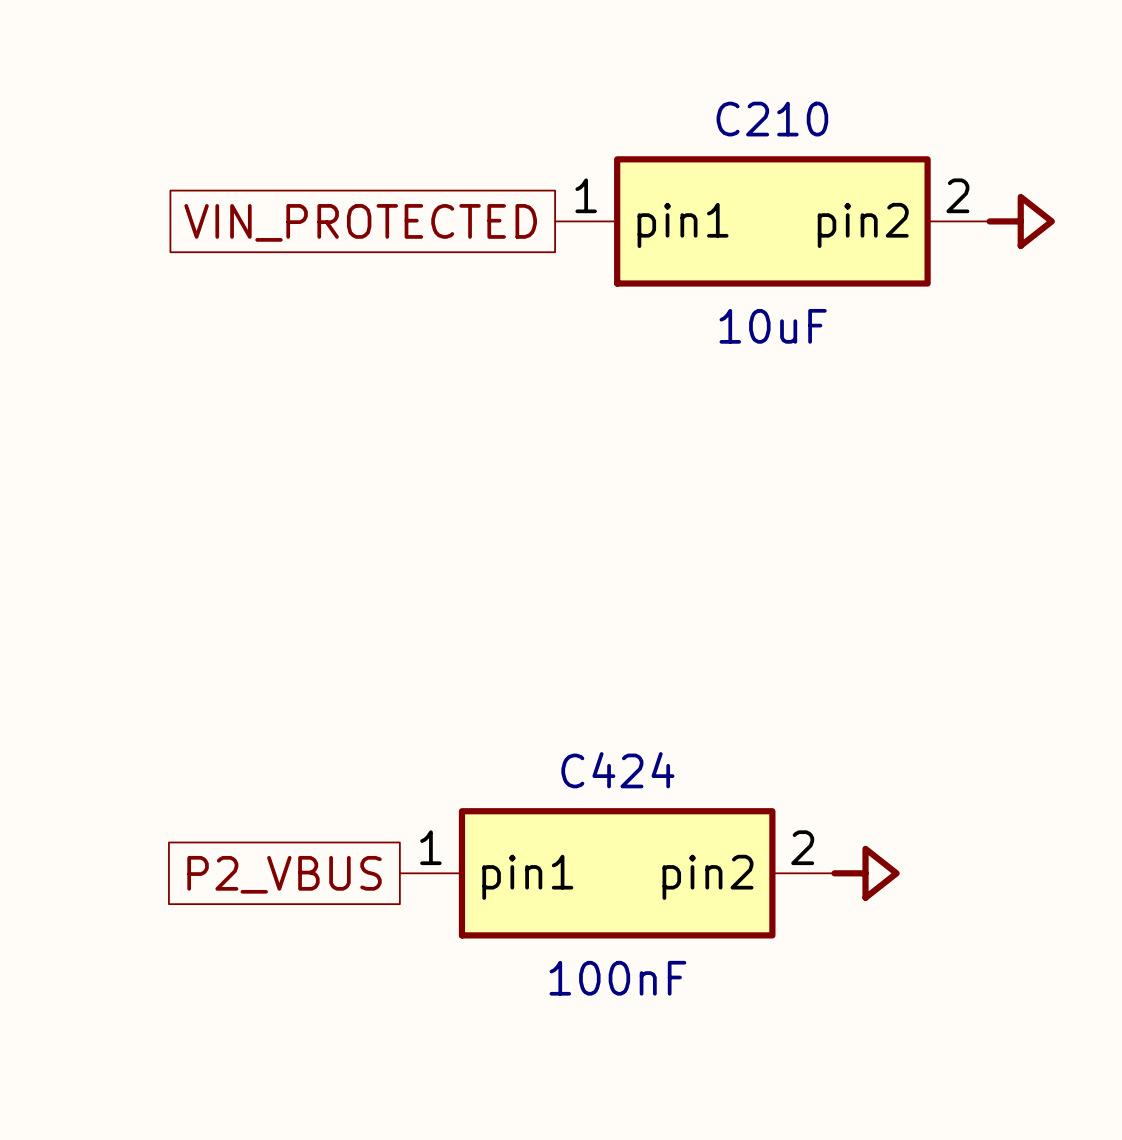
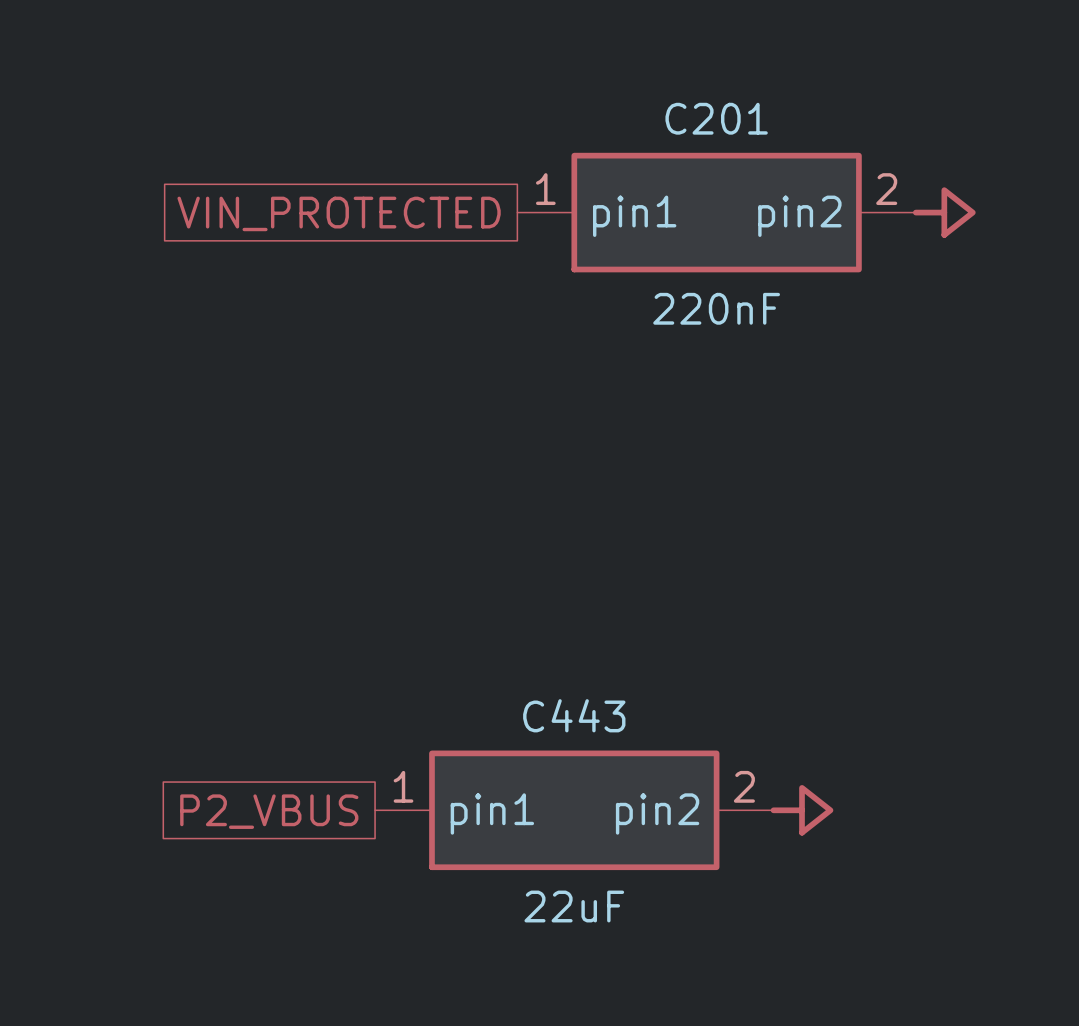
C210 name: C210 (772, 119) -> C201 (716, 118)
C210 value: 10uF (773, 326) -> 220nF (716, 308)
C424 name: C424 (617, 770) -> C443 (574, 715)
C424 value: 100nF (617, 978) -> 22uF (574, 906)

